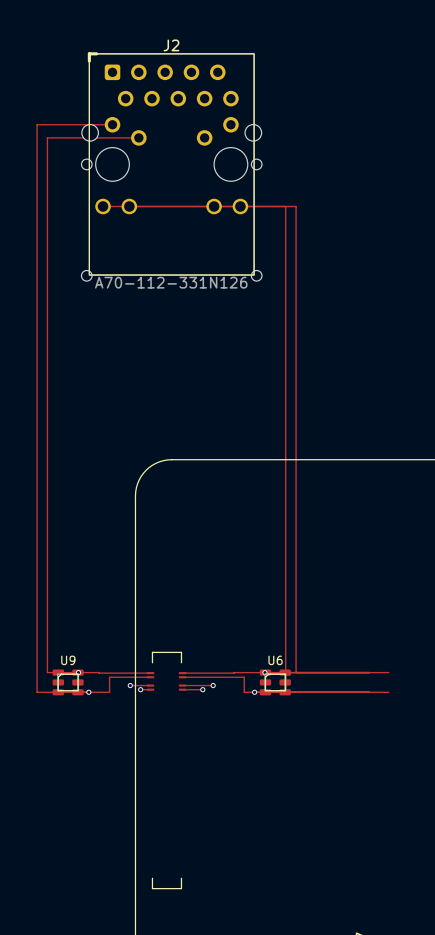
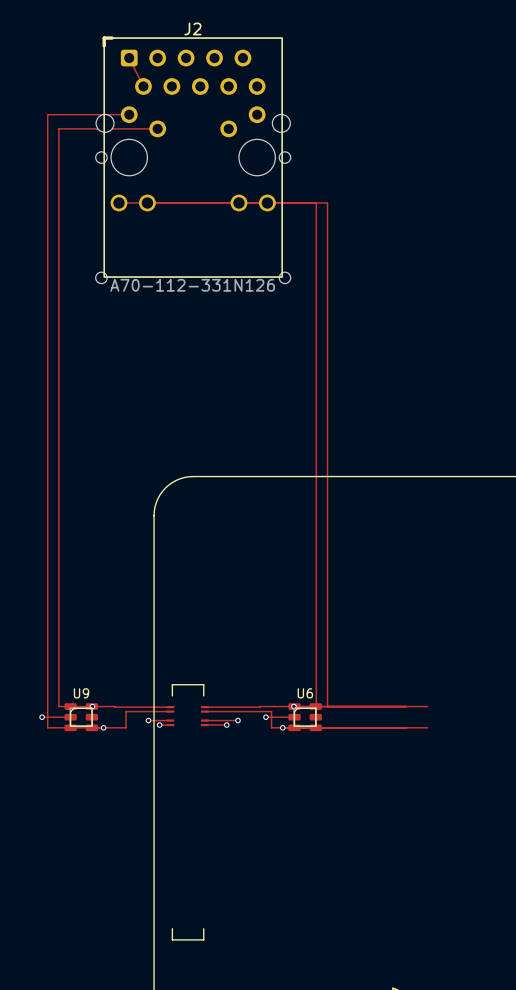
track: none -> (129, 58) (143, 86)
track: none -> (42, 717) (70, 717)
via: none -> (42, 717)
track: none -> (265, 717) (294, 717)
via: none -> (265, 717)

